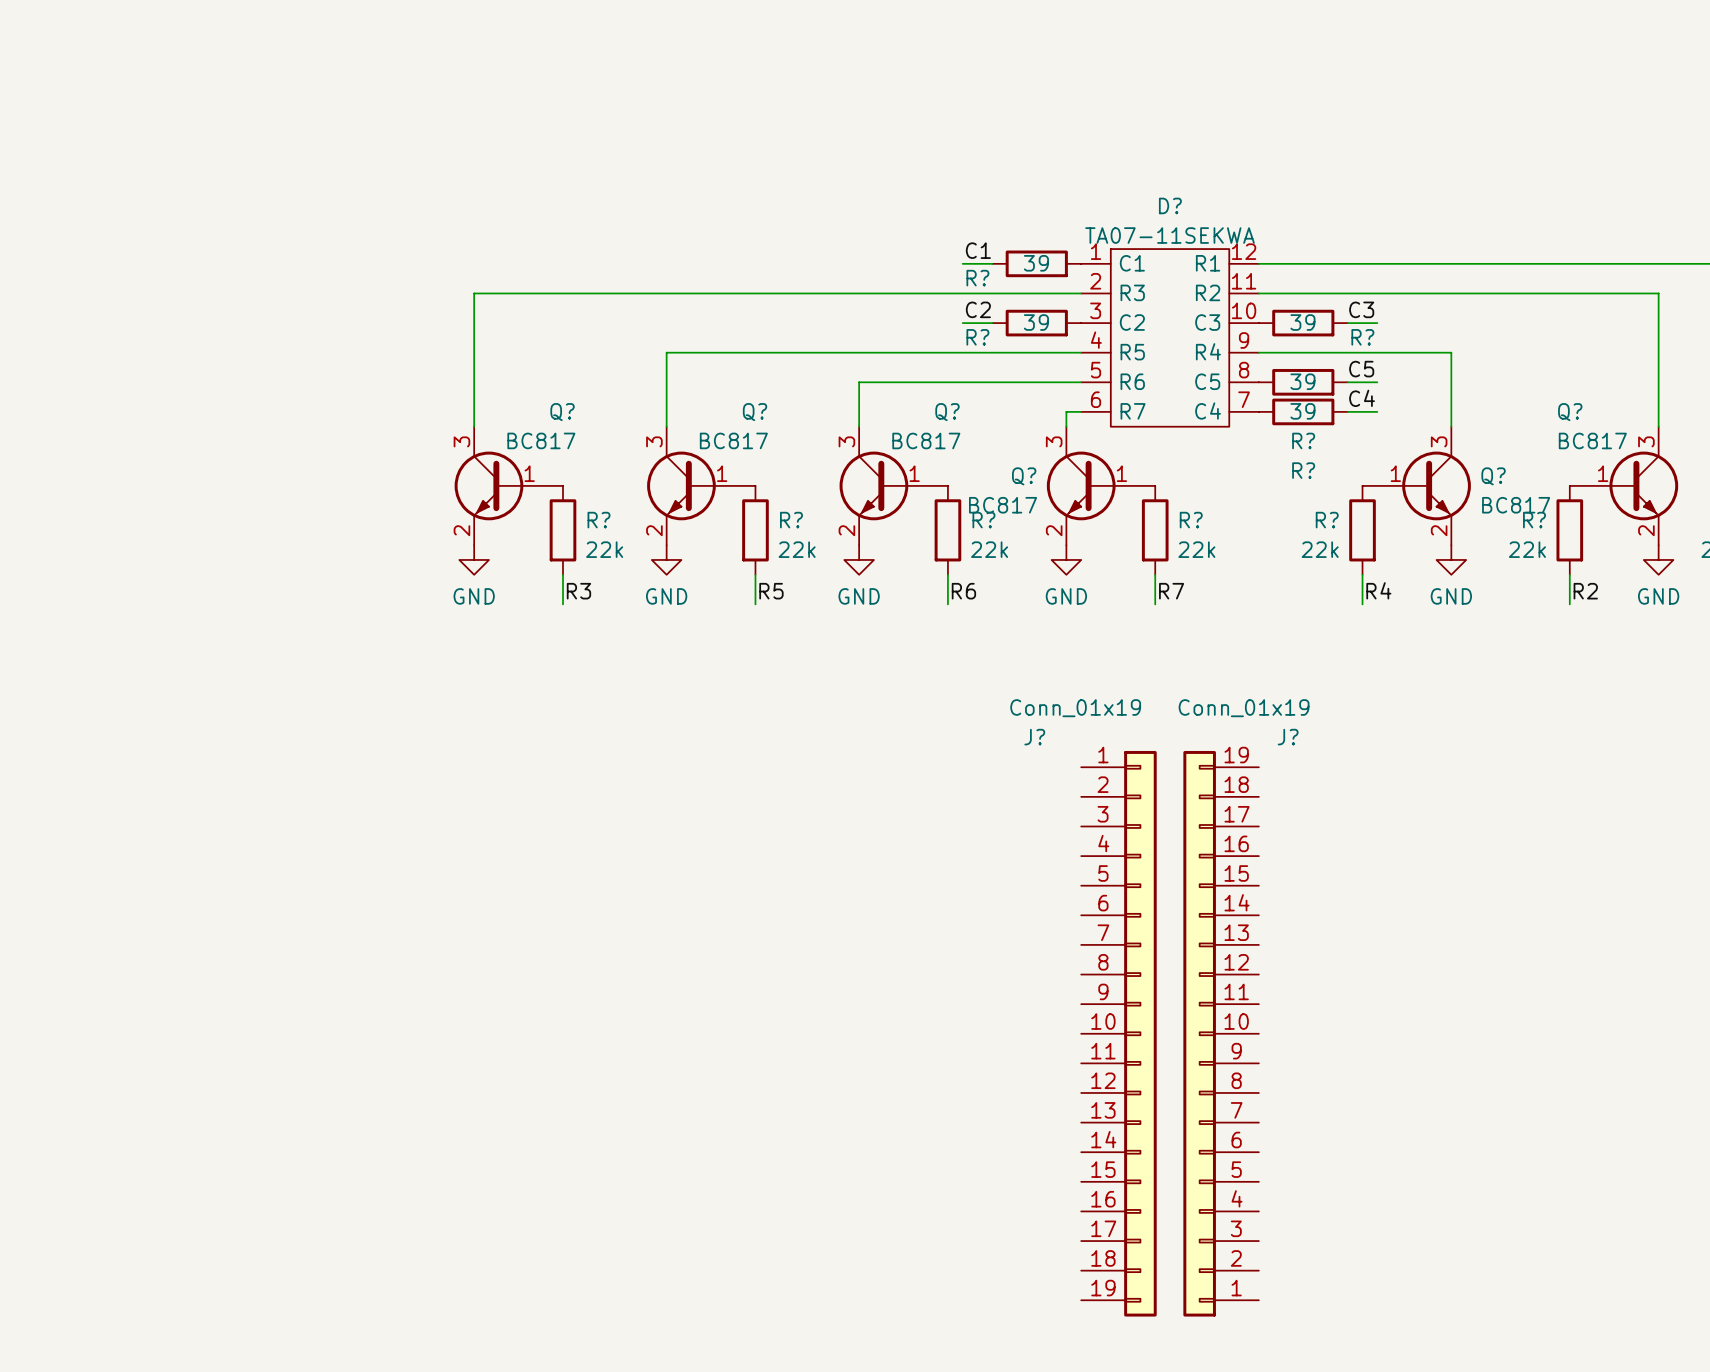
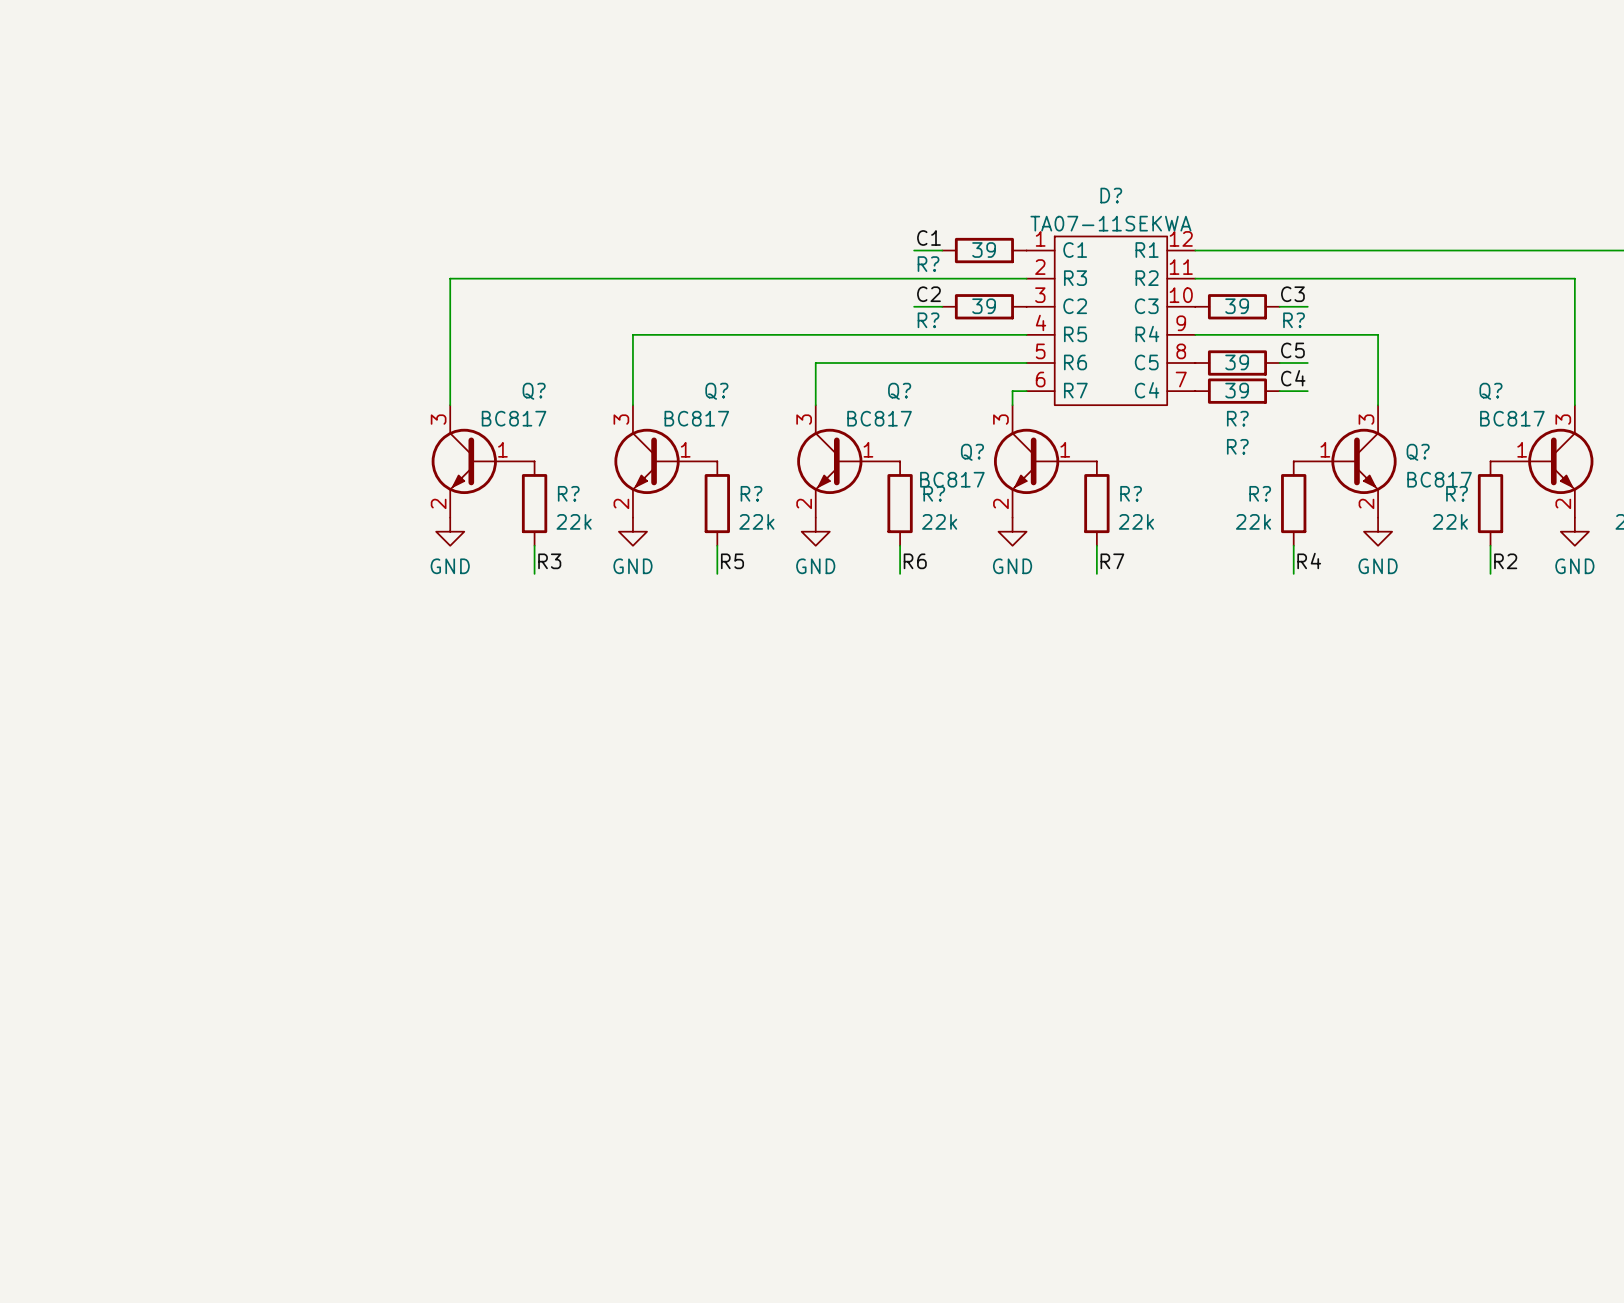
J?: Conn_01x19 (1118, 1033) -> none
J?: Conn_01x19 (1221, 1033) -> none

